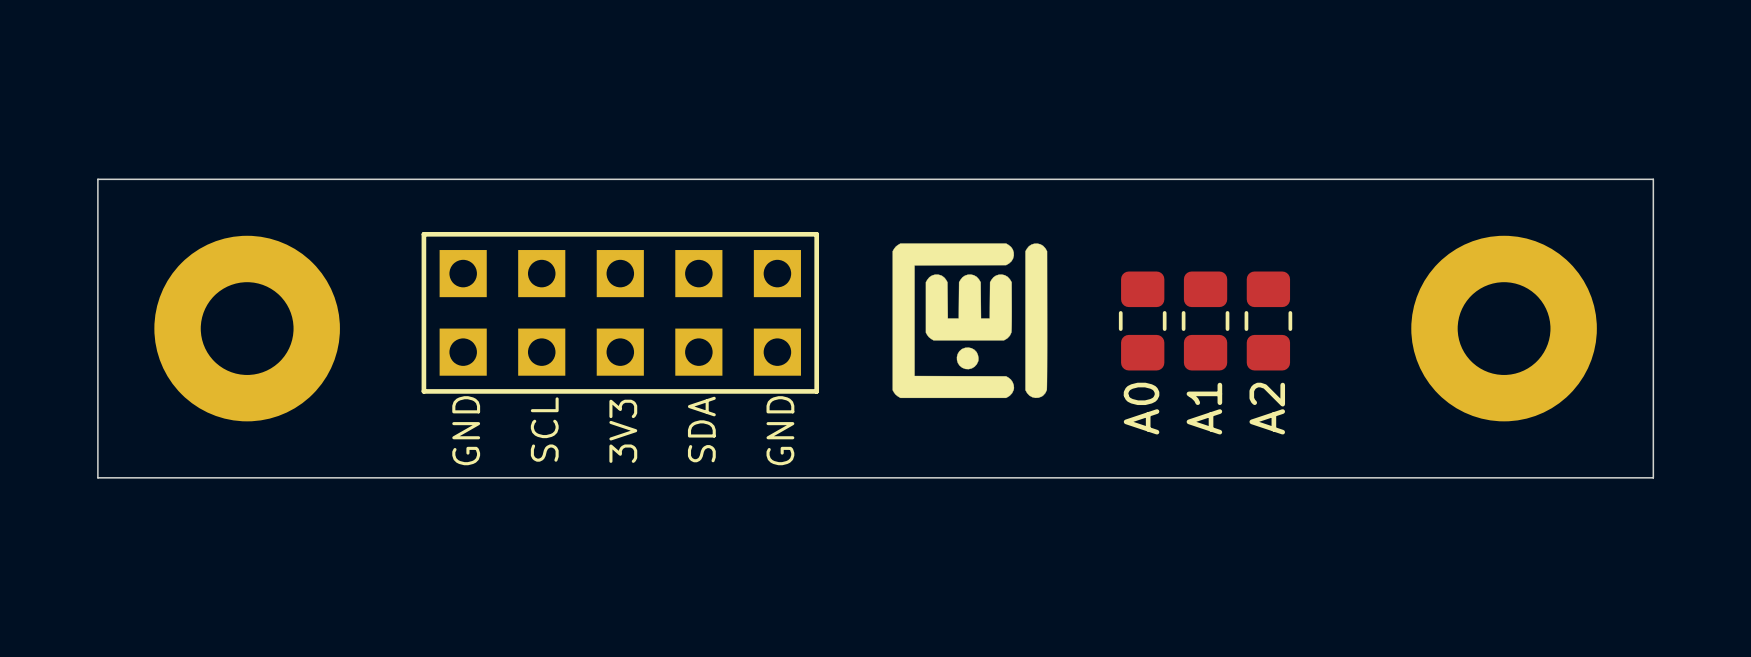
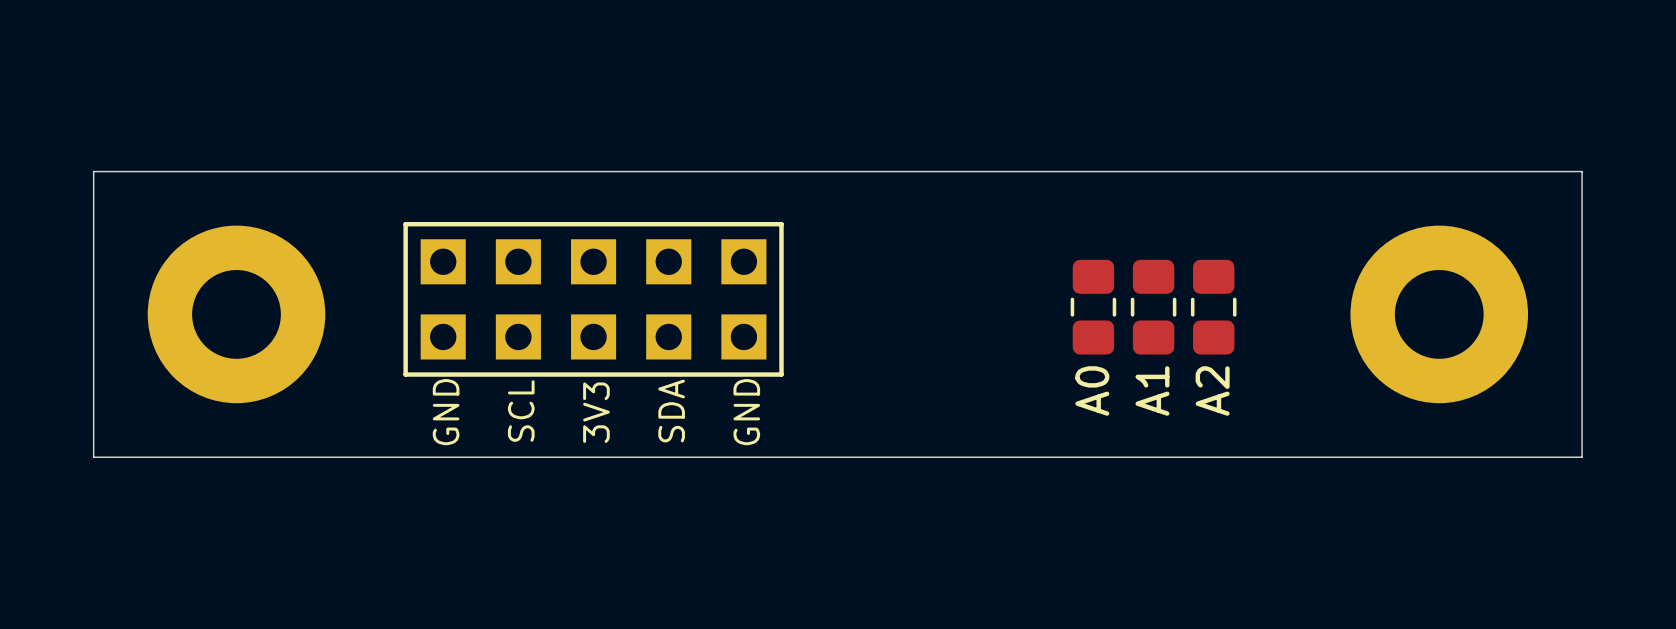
drawing: [892, 243, 1048, 399] -> none

